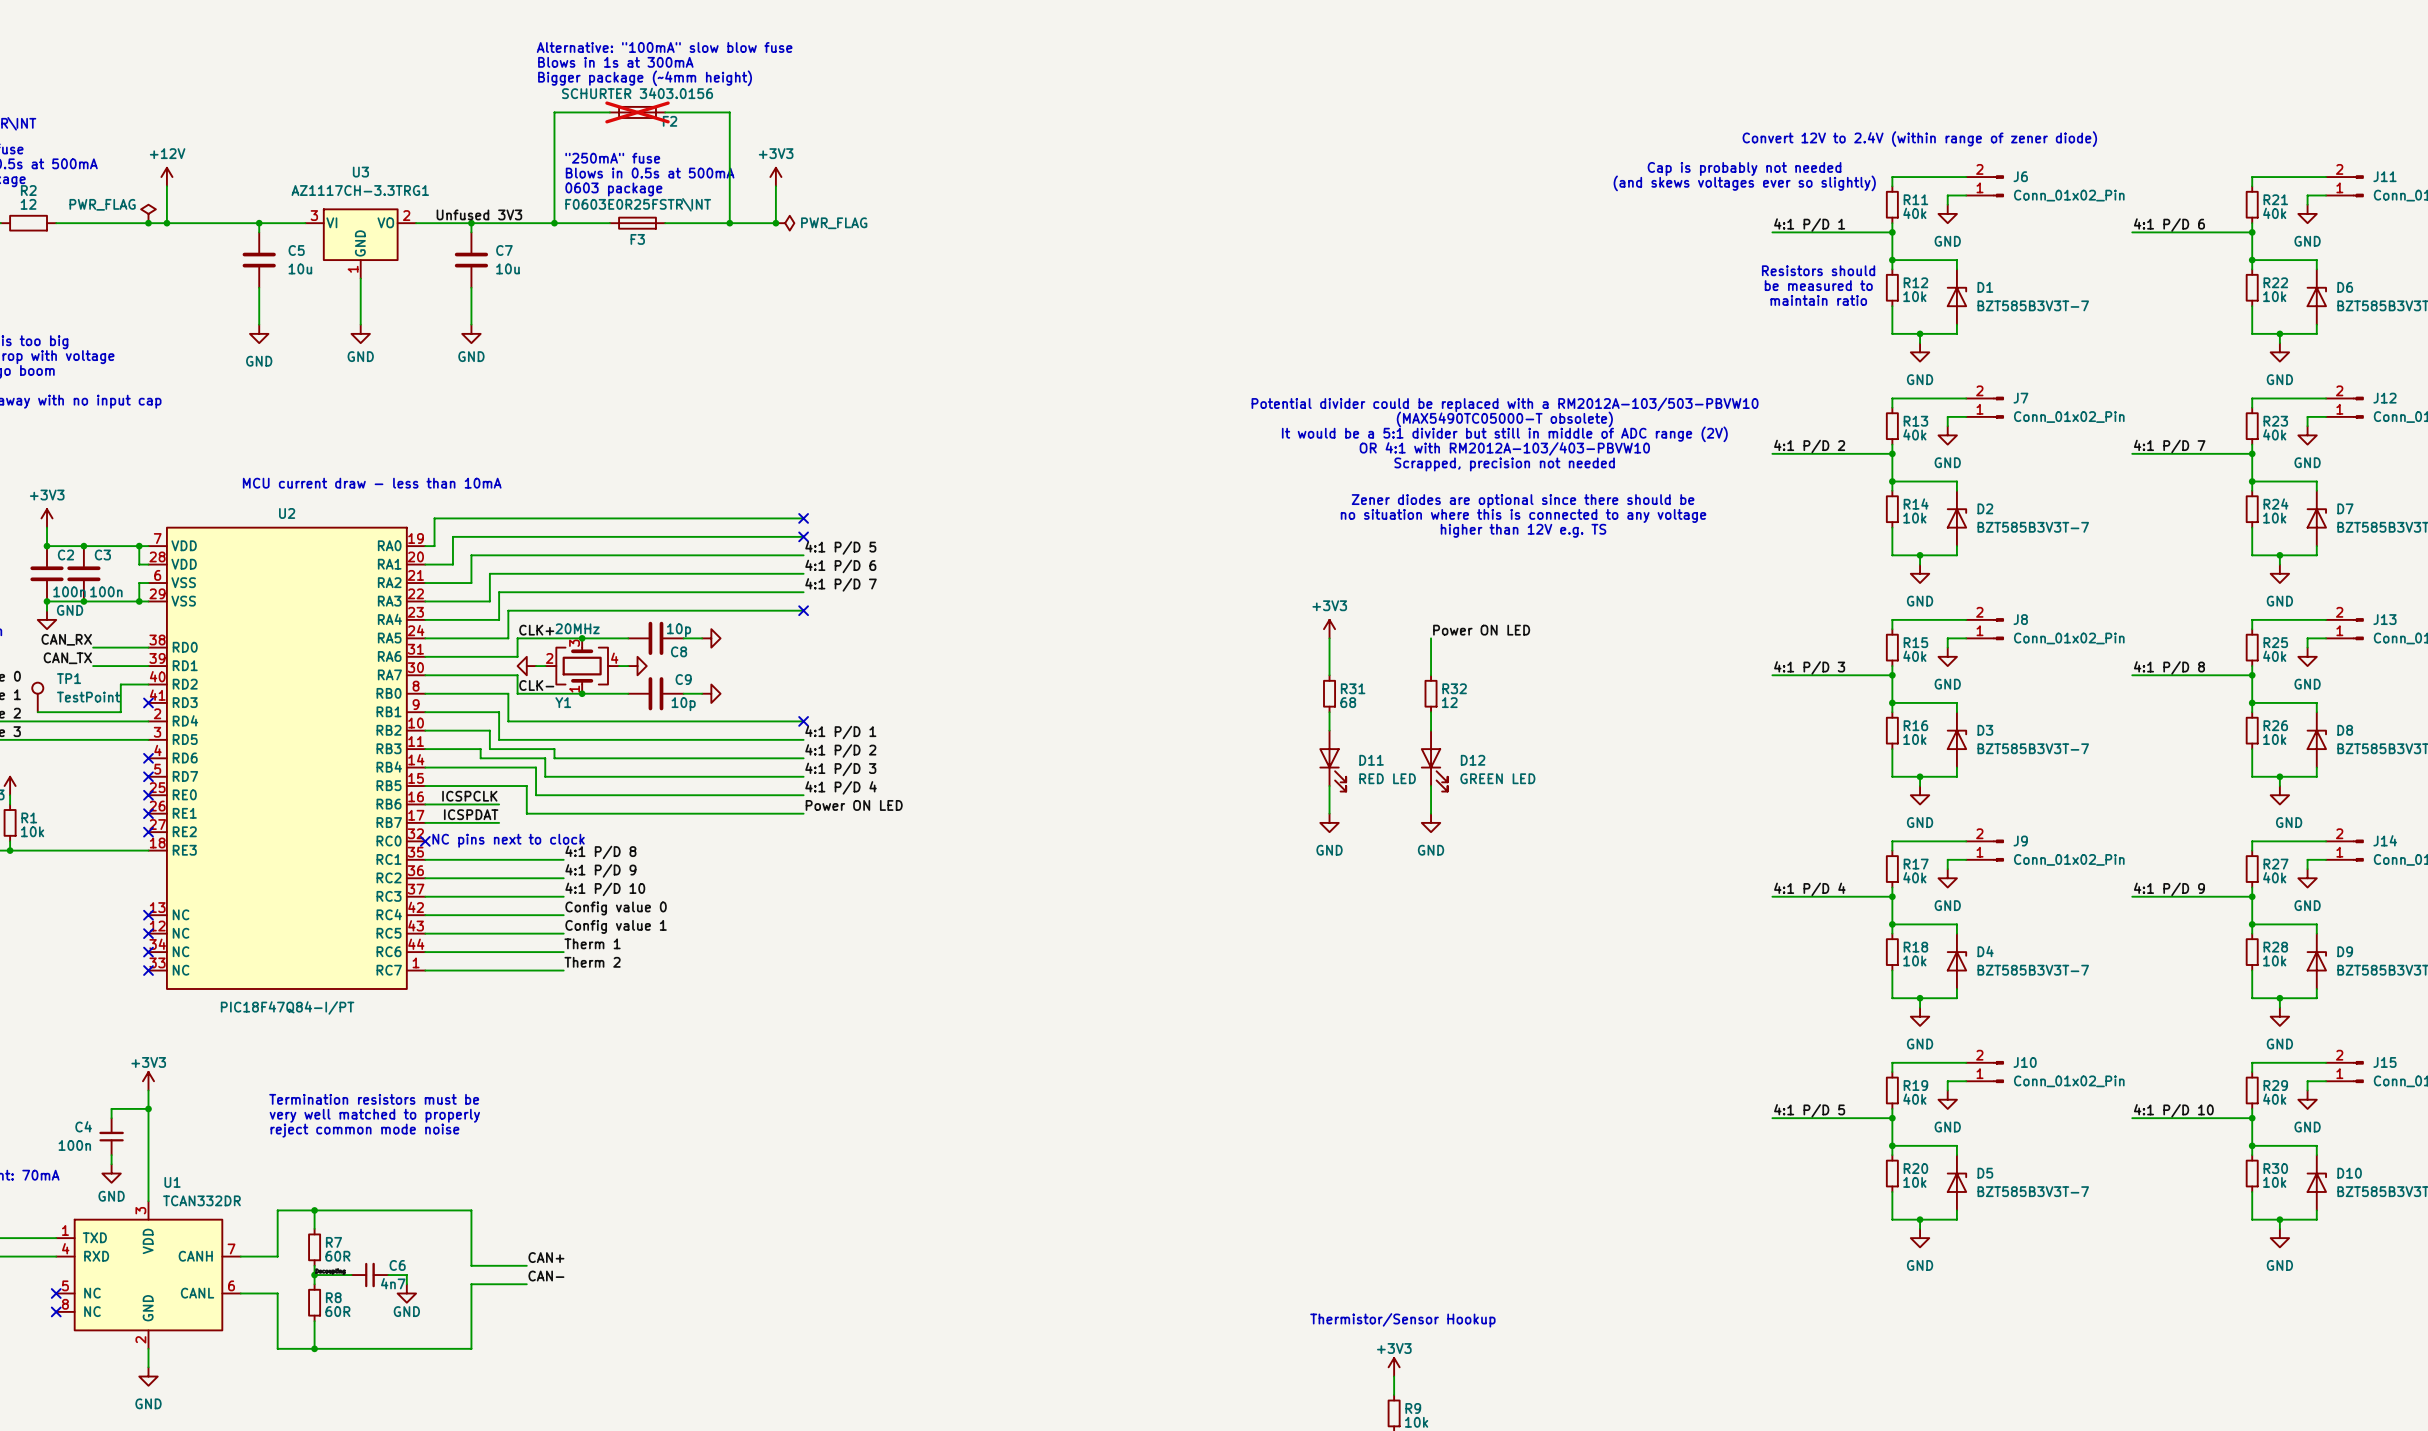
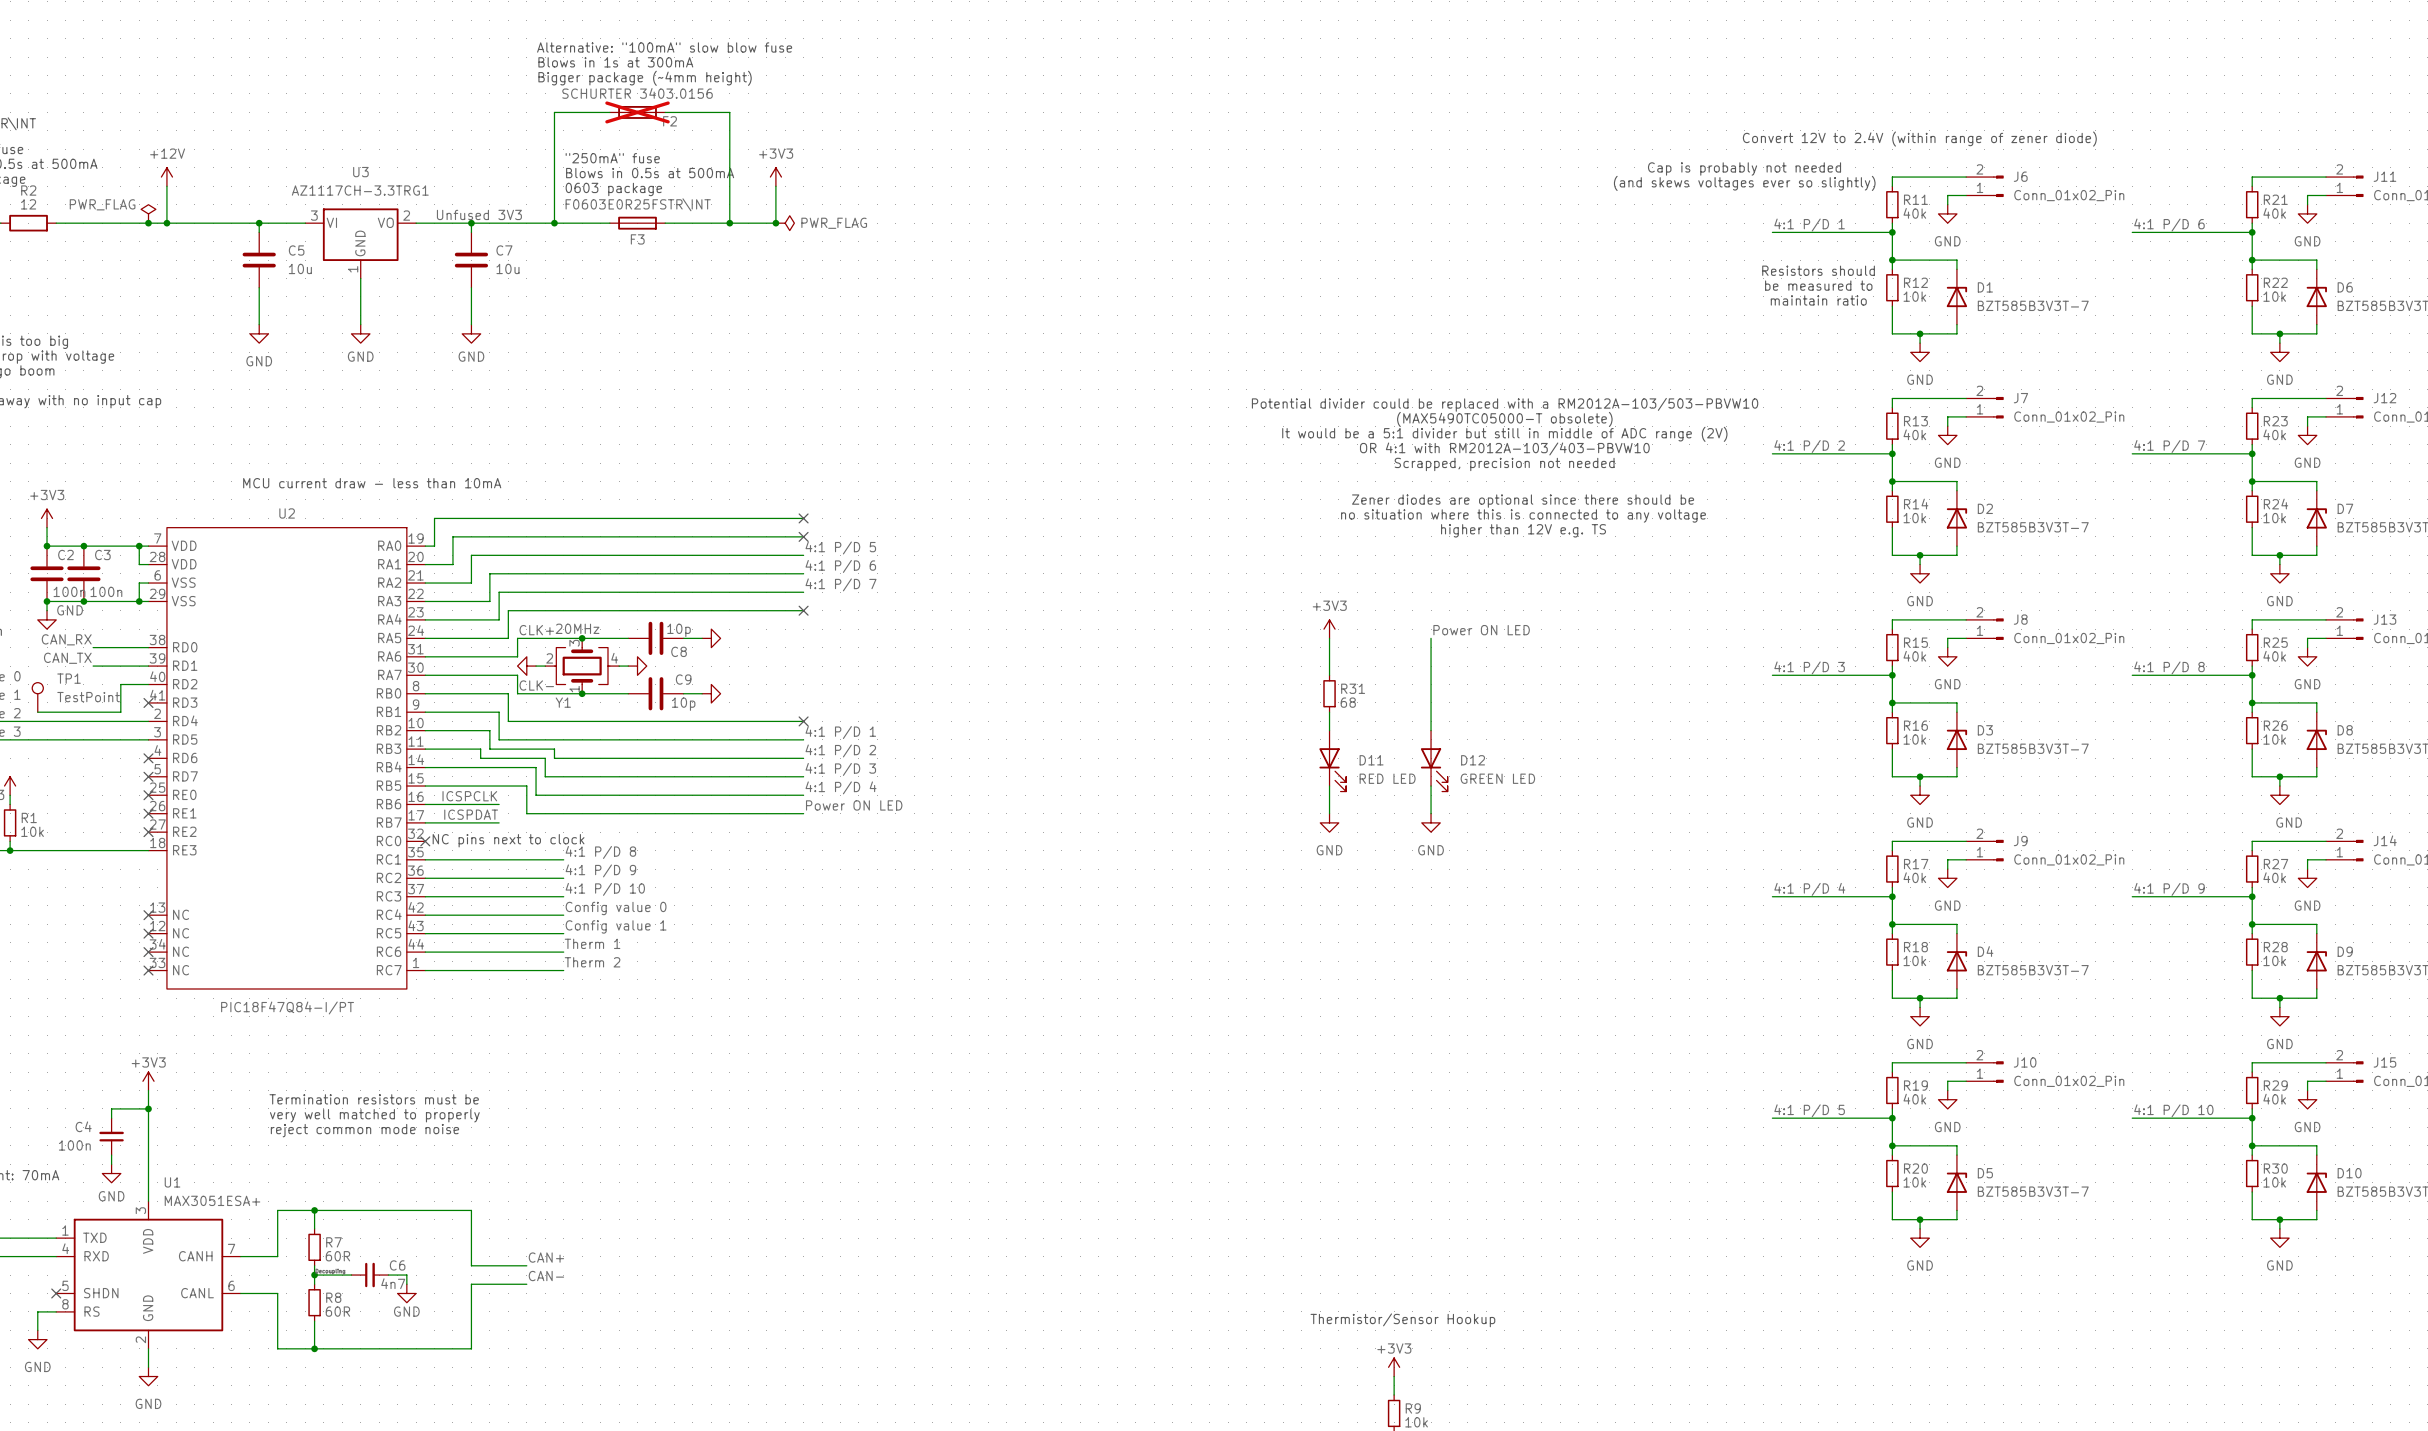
wire: none -> (1431, 675) (1431, 712)
R32: 12 (1431, 693) -> none
U1 value: TCAN332DR (201, 1200) -> MAX3051ESA+ (212, 1200)
U1 pin name: NC (92, 1293) -> SHDN (101, 1293)
wire: none -> (56, 1311) (37, 1311) (37, 1330)
no-connect mark: (56, 1311) -> none
U1 pin name: NC (92, 1311) -> RS (92, 1311)
power symbol: none -> GND (37, 1339)

